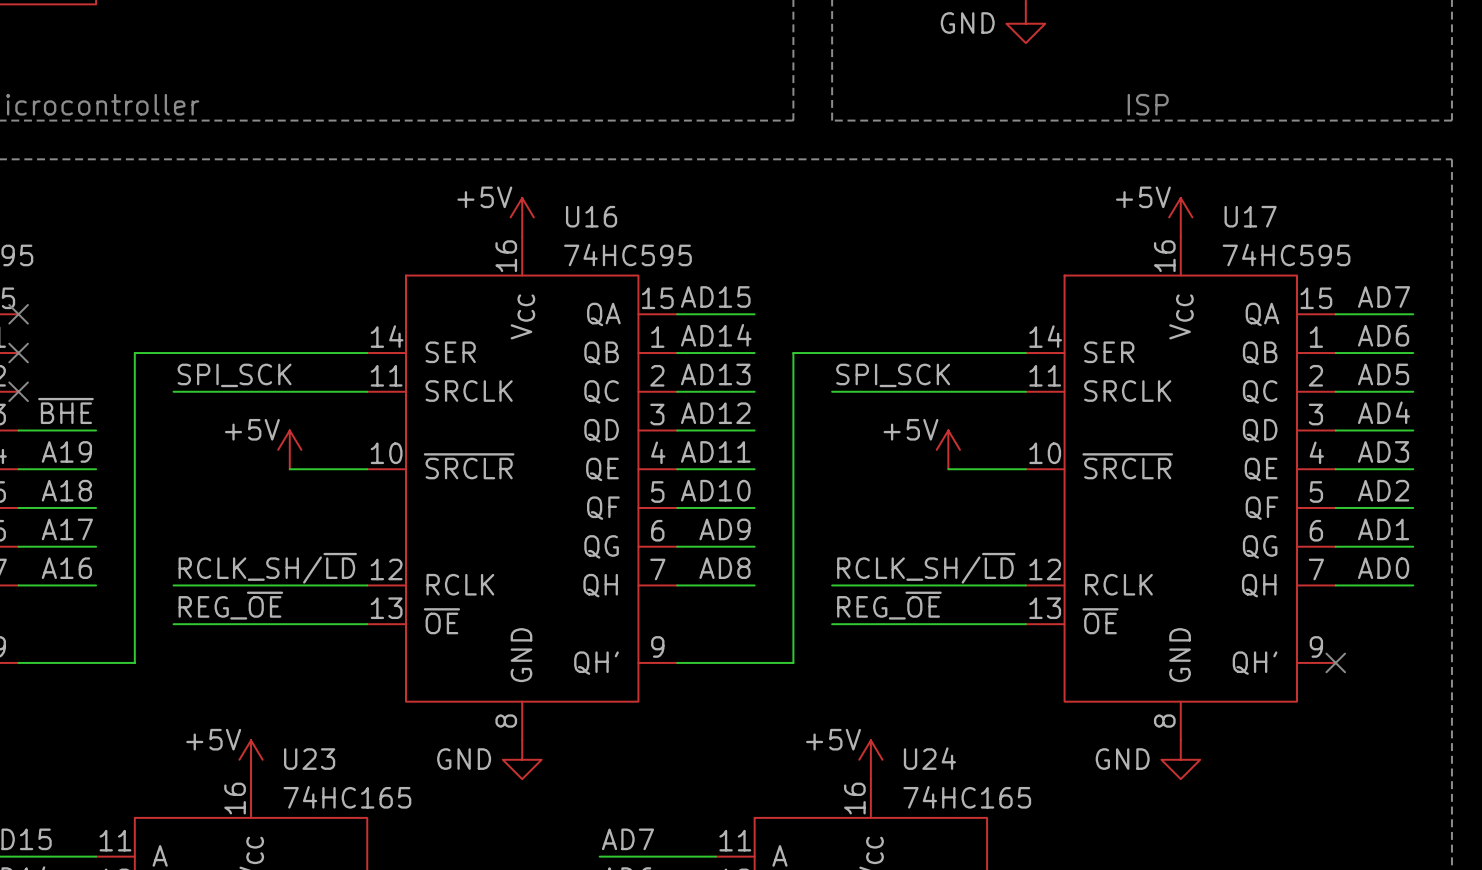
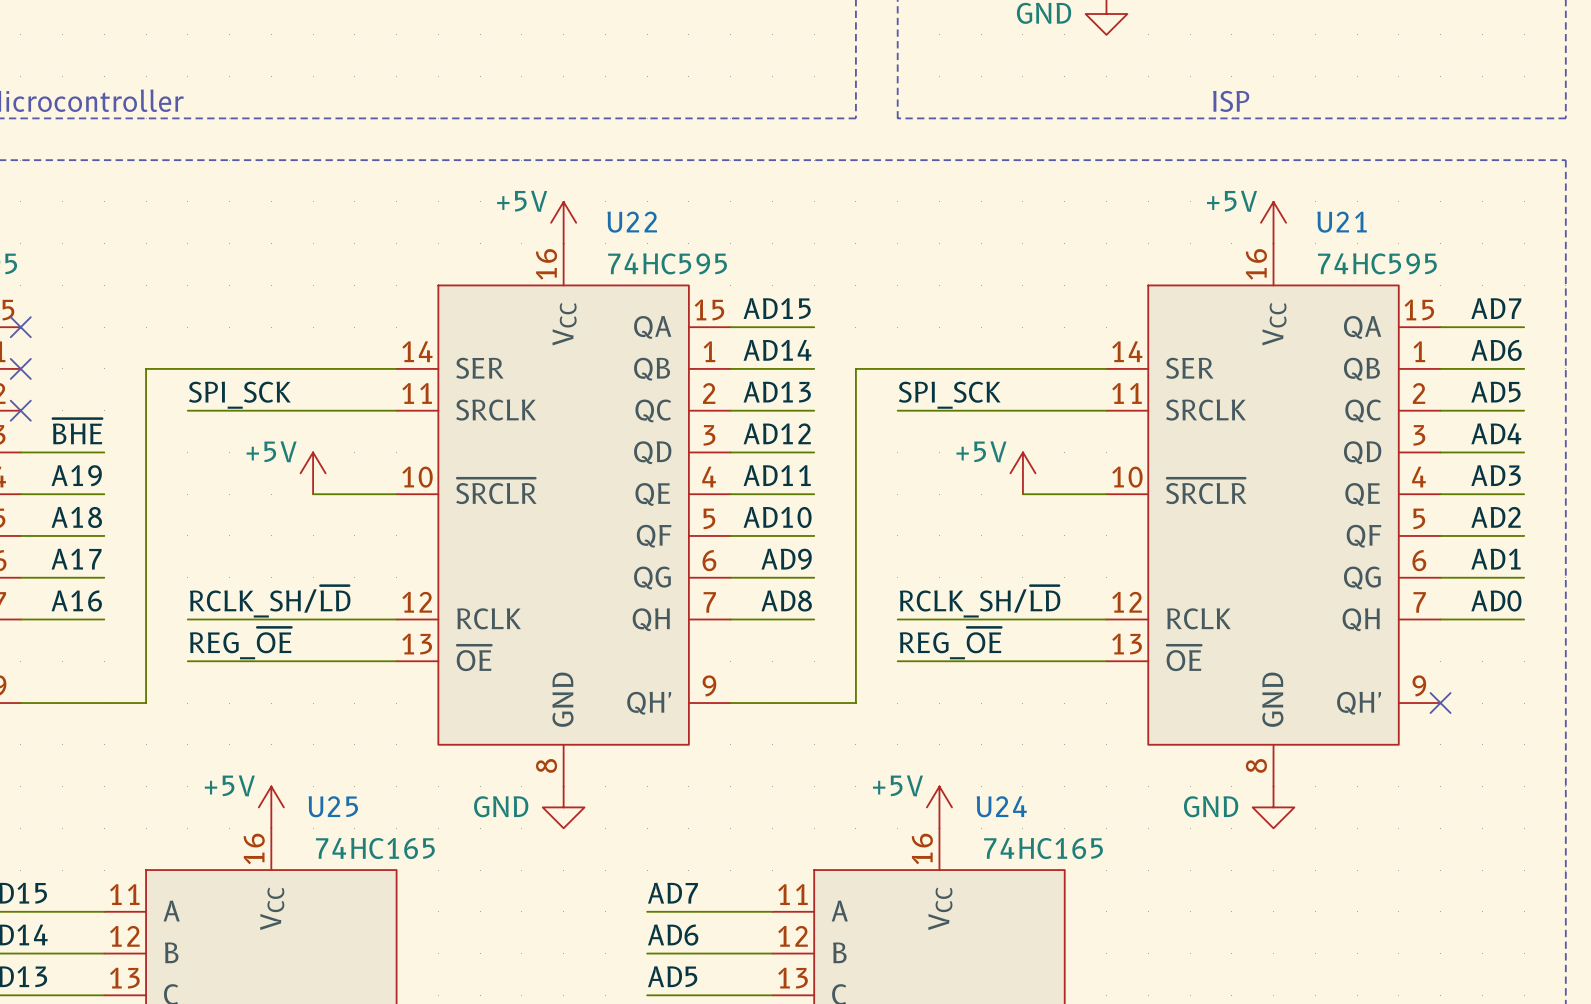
U16 name: U16 (591, 216) -> U22 (632, 222)
U17 name: U17 (1250, 216) -> U21 (1342, 222)
U23 name: U23 (309, 759) -> U25 (333, 806)

